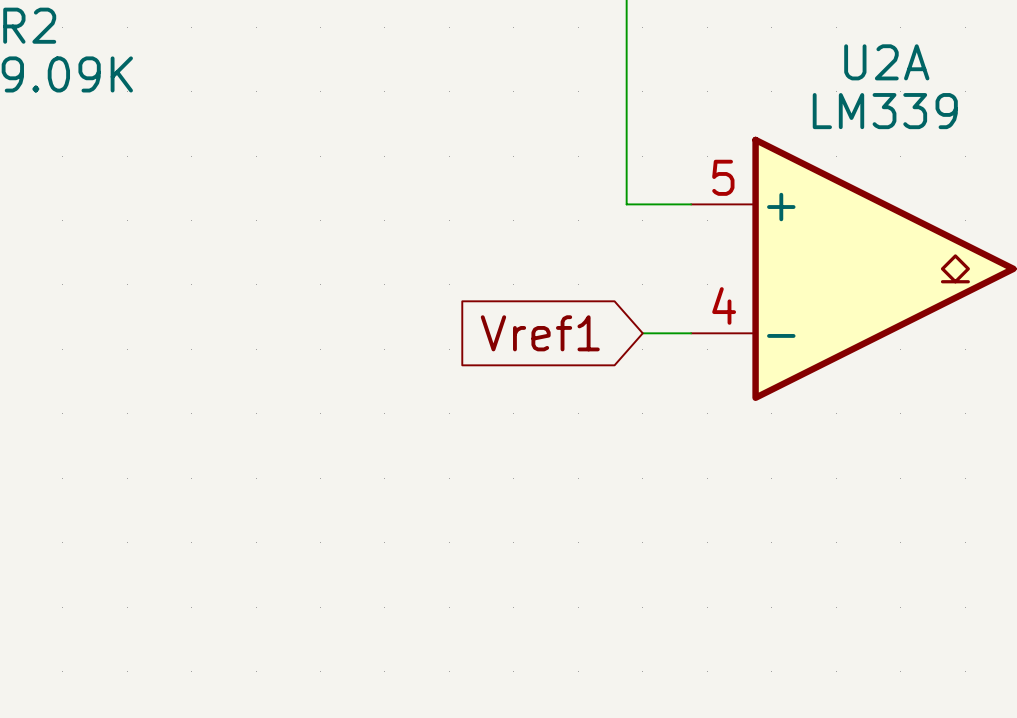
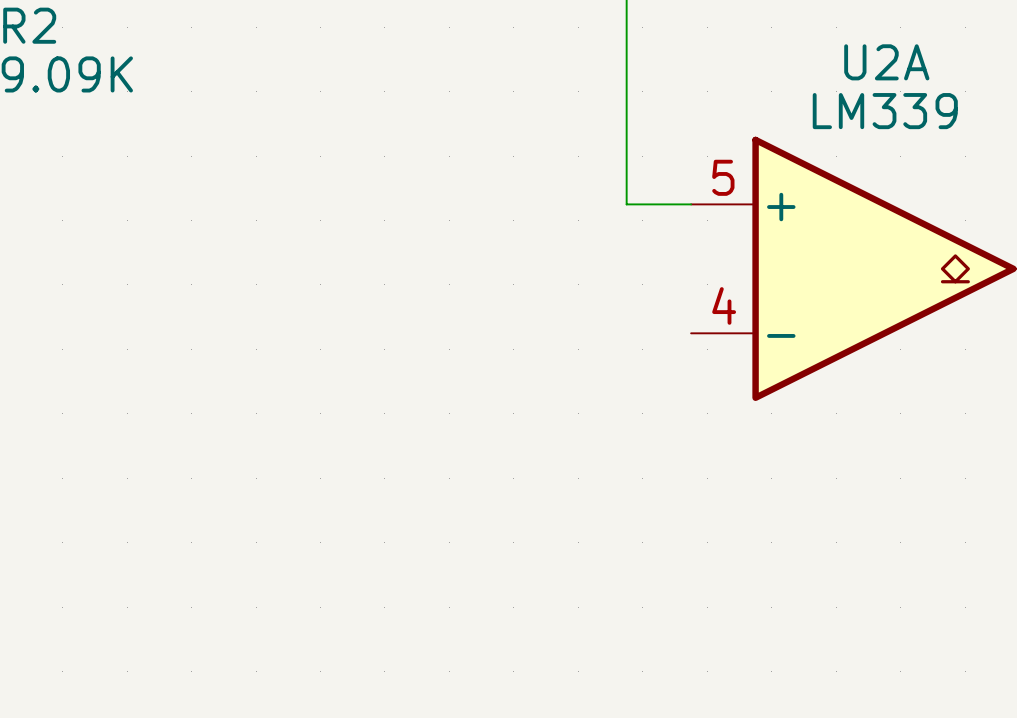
global label: Vref1 (540, 333) -> none
wire: (642, 333) (691, 333) -> none

